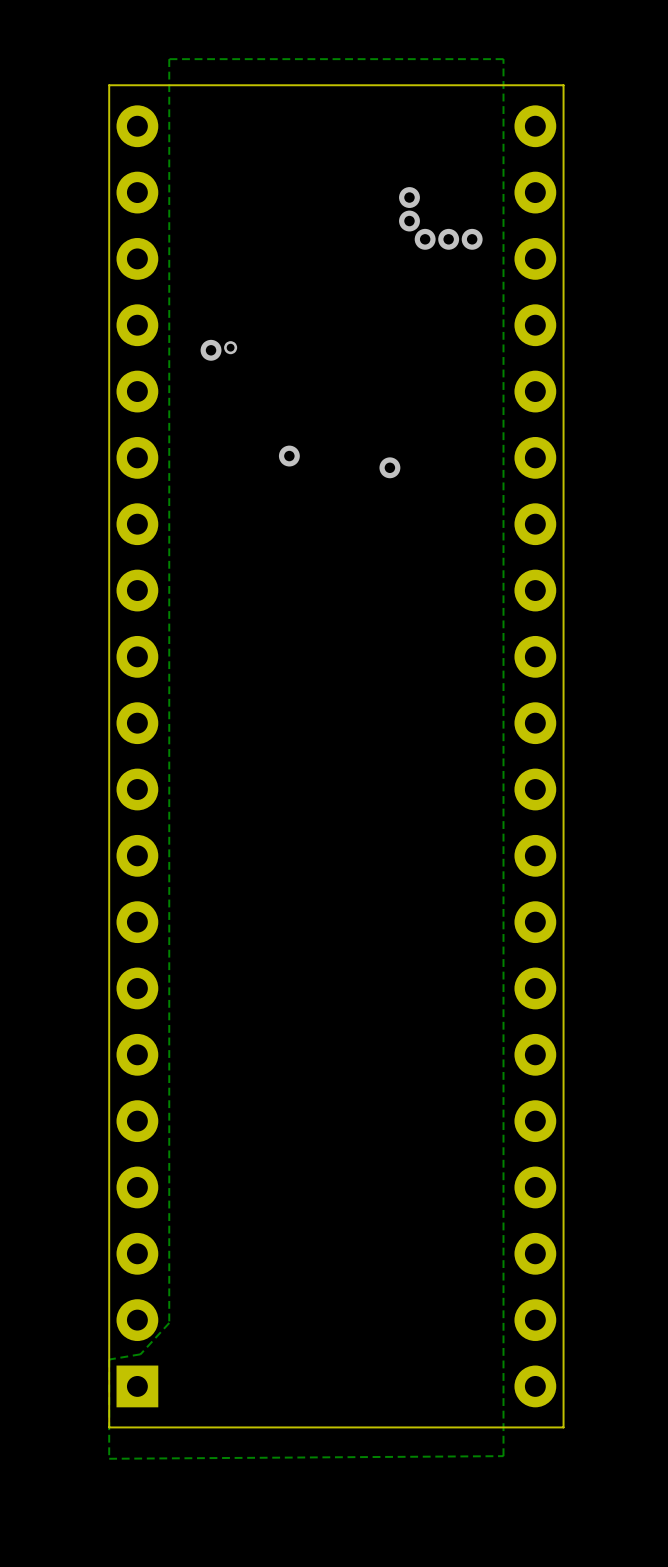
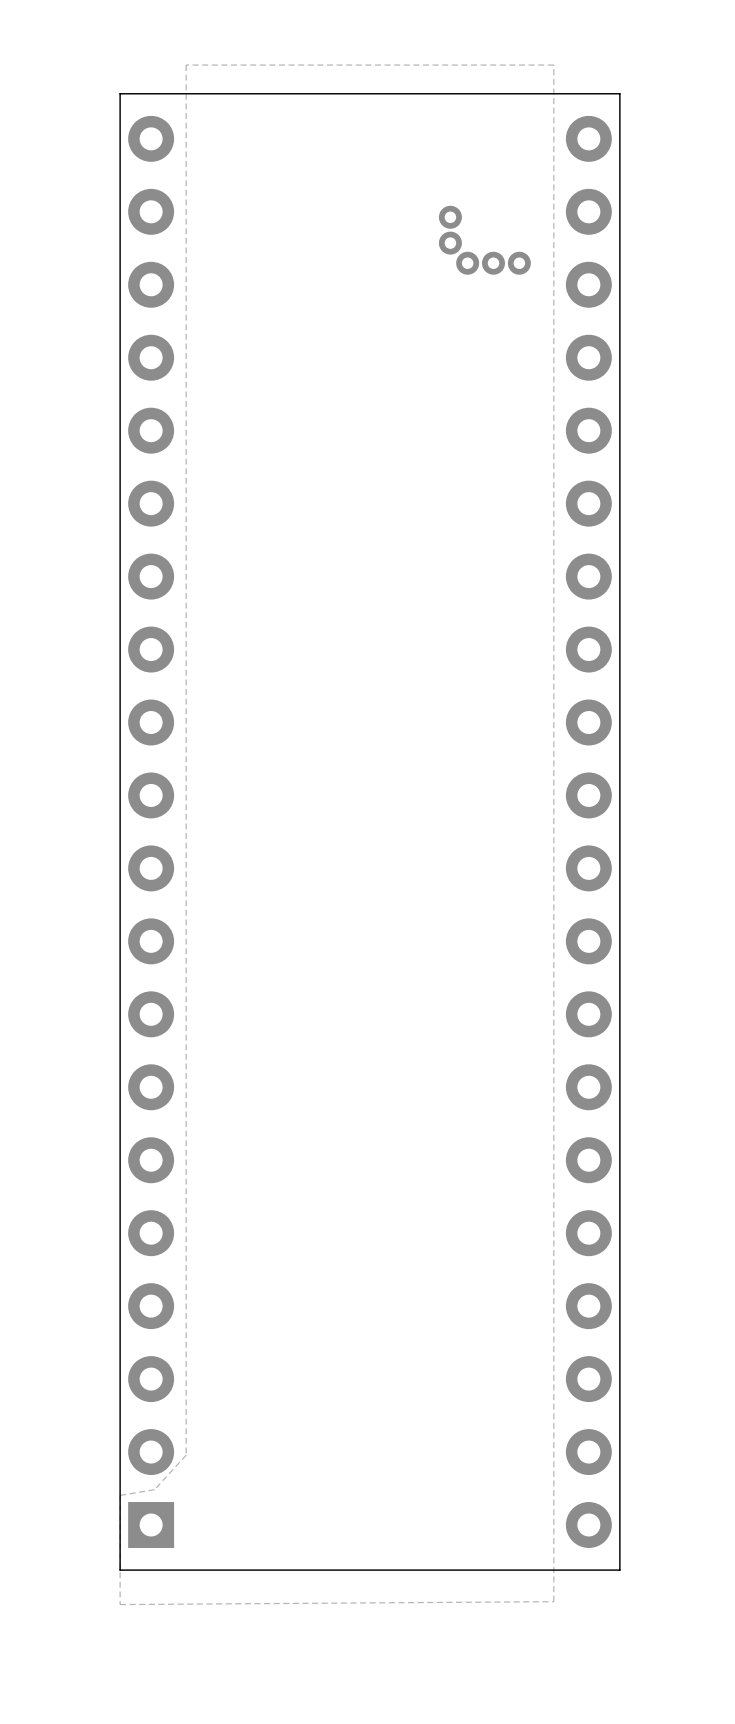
via: (230, 347) -> none
via: (211, 350) -> none
via: (289, 456) -> none
via: (389, 467) -> none

